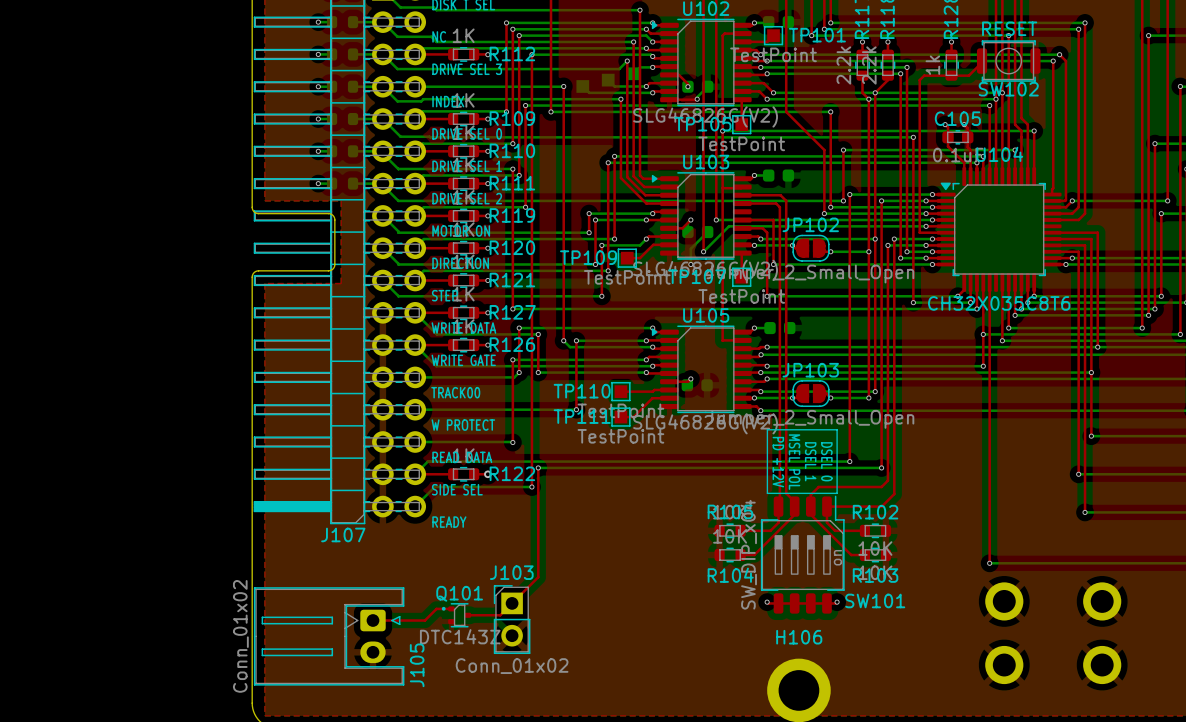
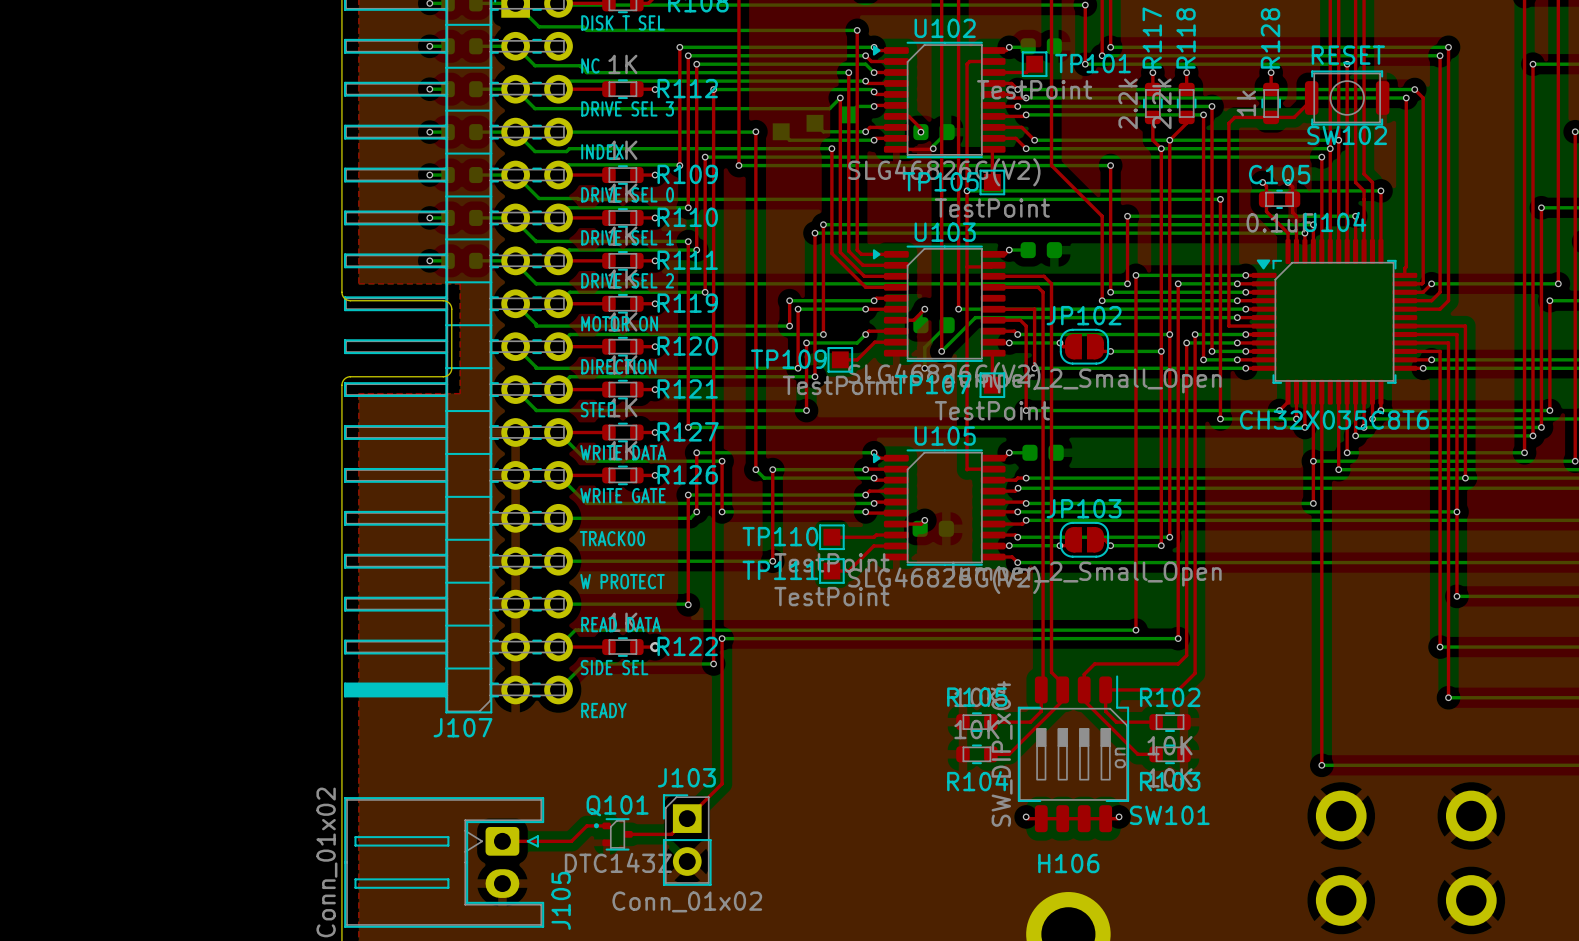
line: (767, 429) (837, 429) (837, 493) (767, 493) (767, 429) -> none
text: DSEL 1 (810, 461) -> none
text: DSEL 0 (826, 461) -> none
text: PD +12V (778, 462) -> none
text: MSEL POL (794, 462) -> none

